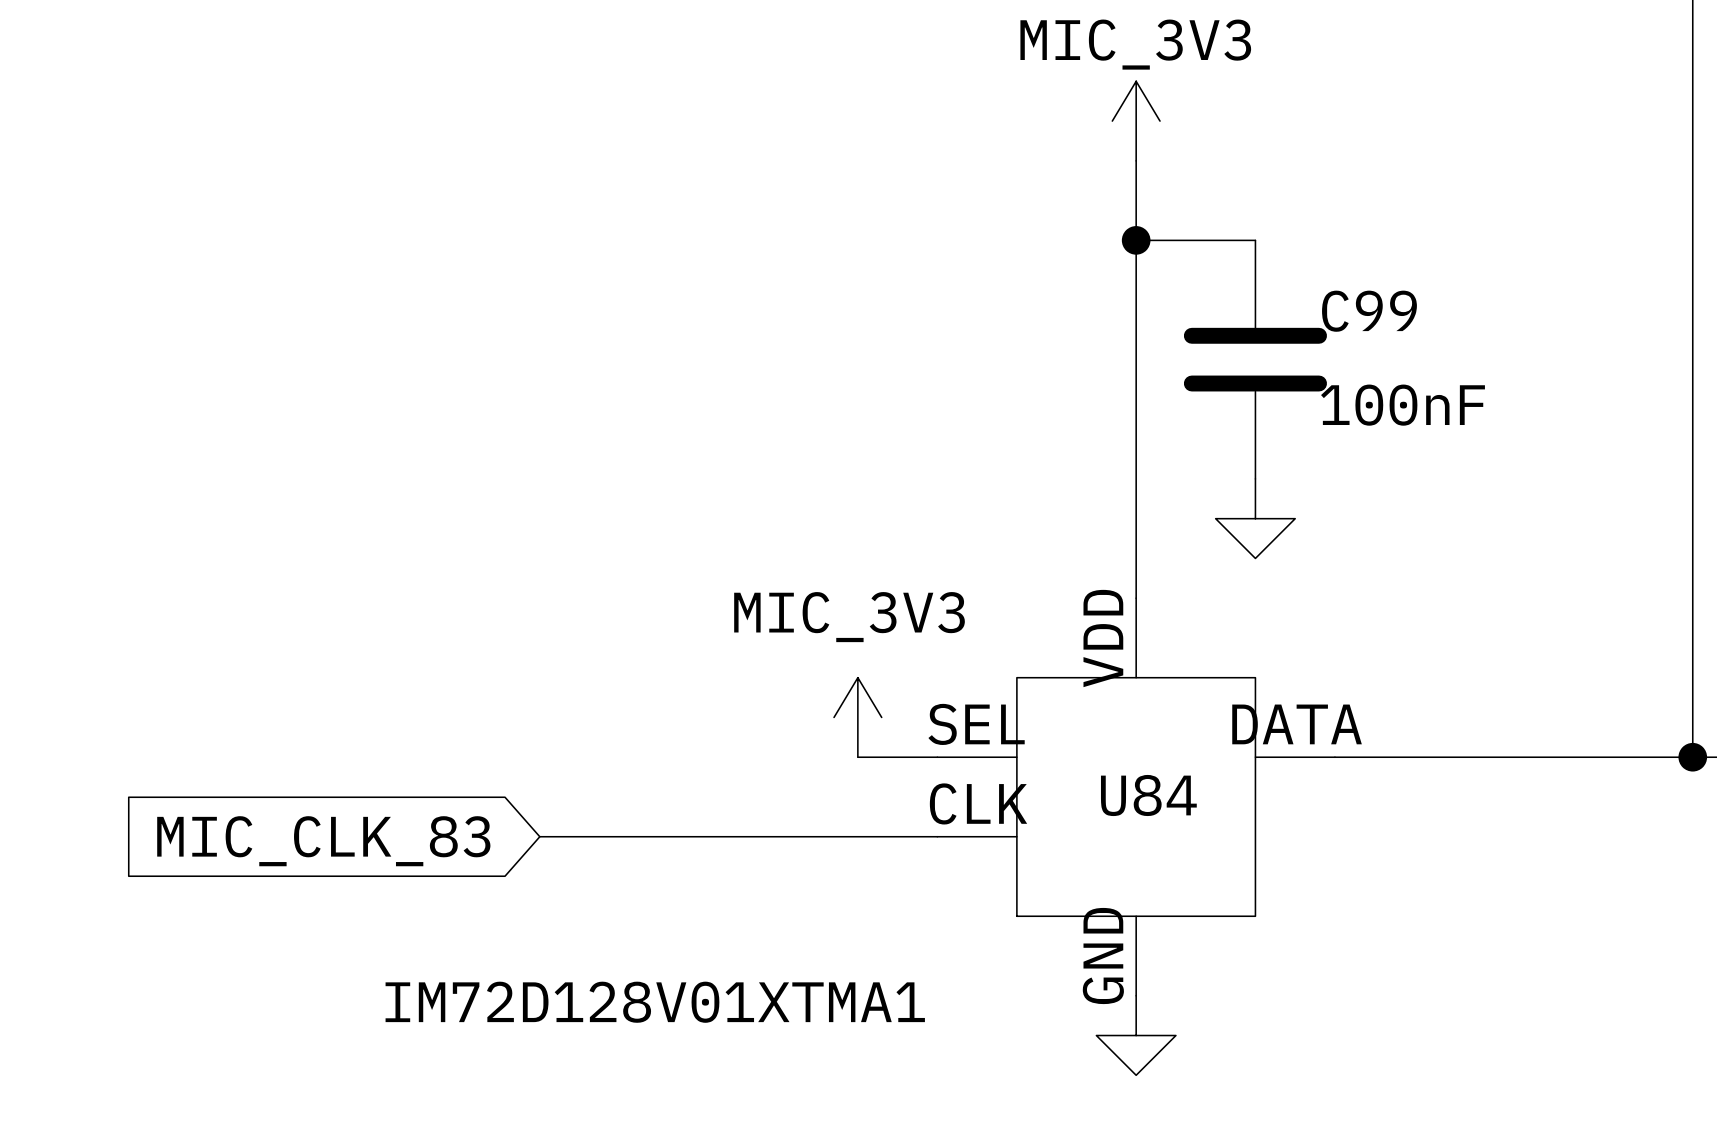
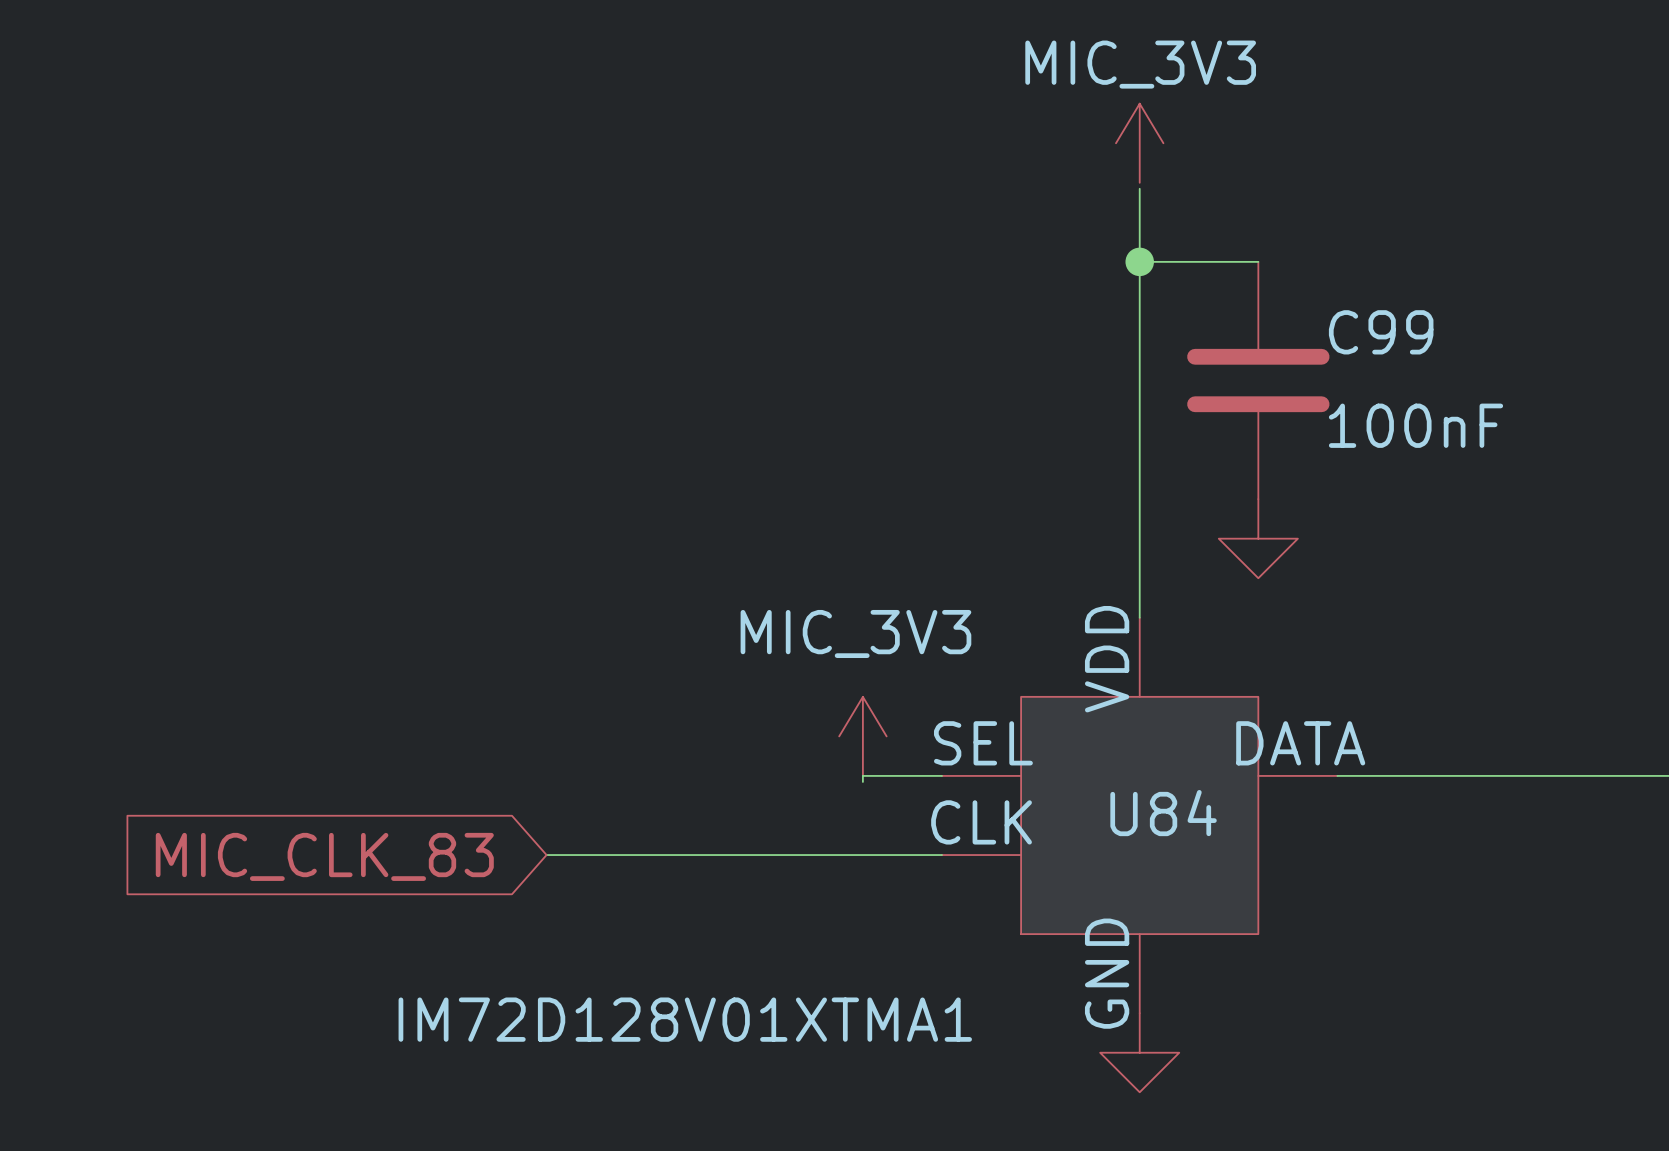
wire: (1136, 160) (1136, 166) -> (862, 775) (862, 781)

